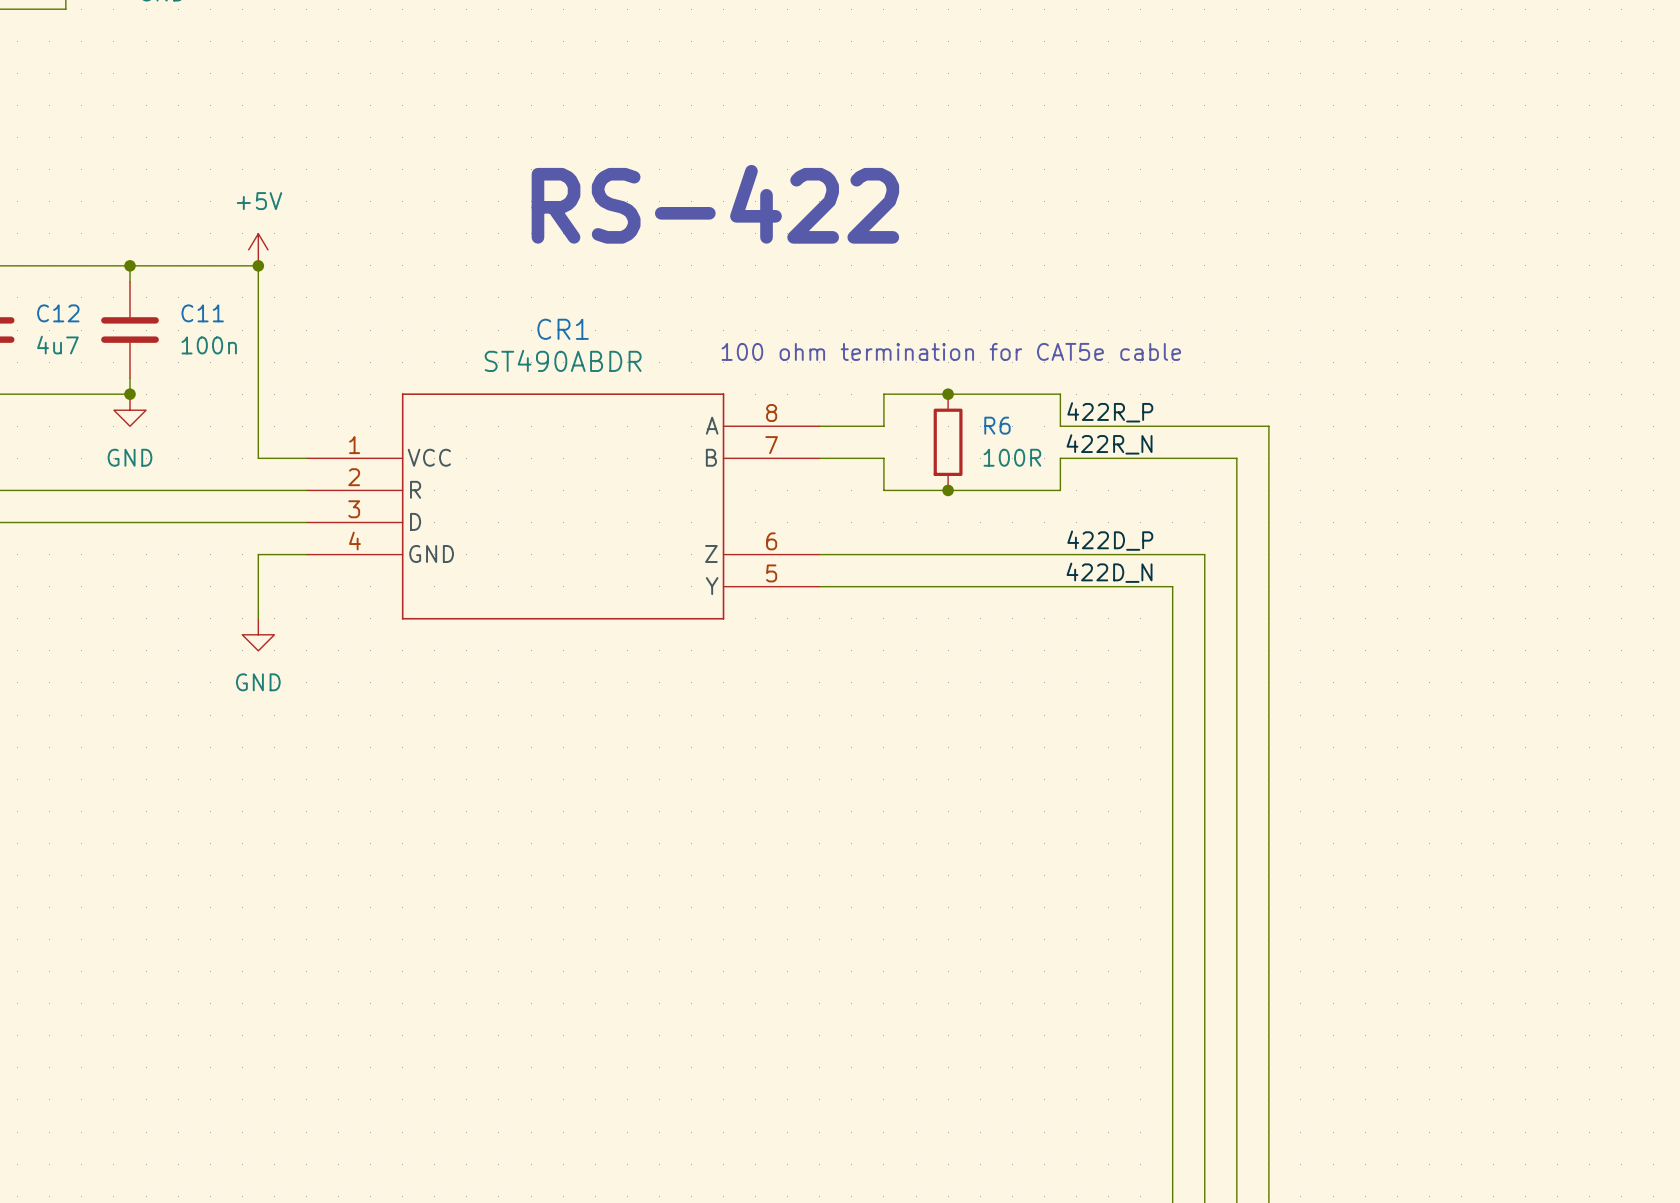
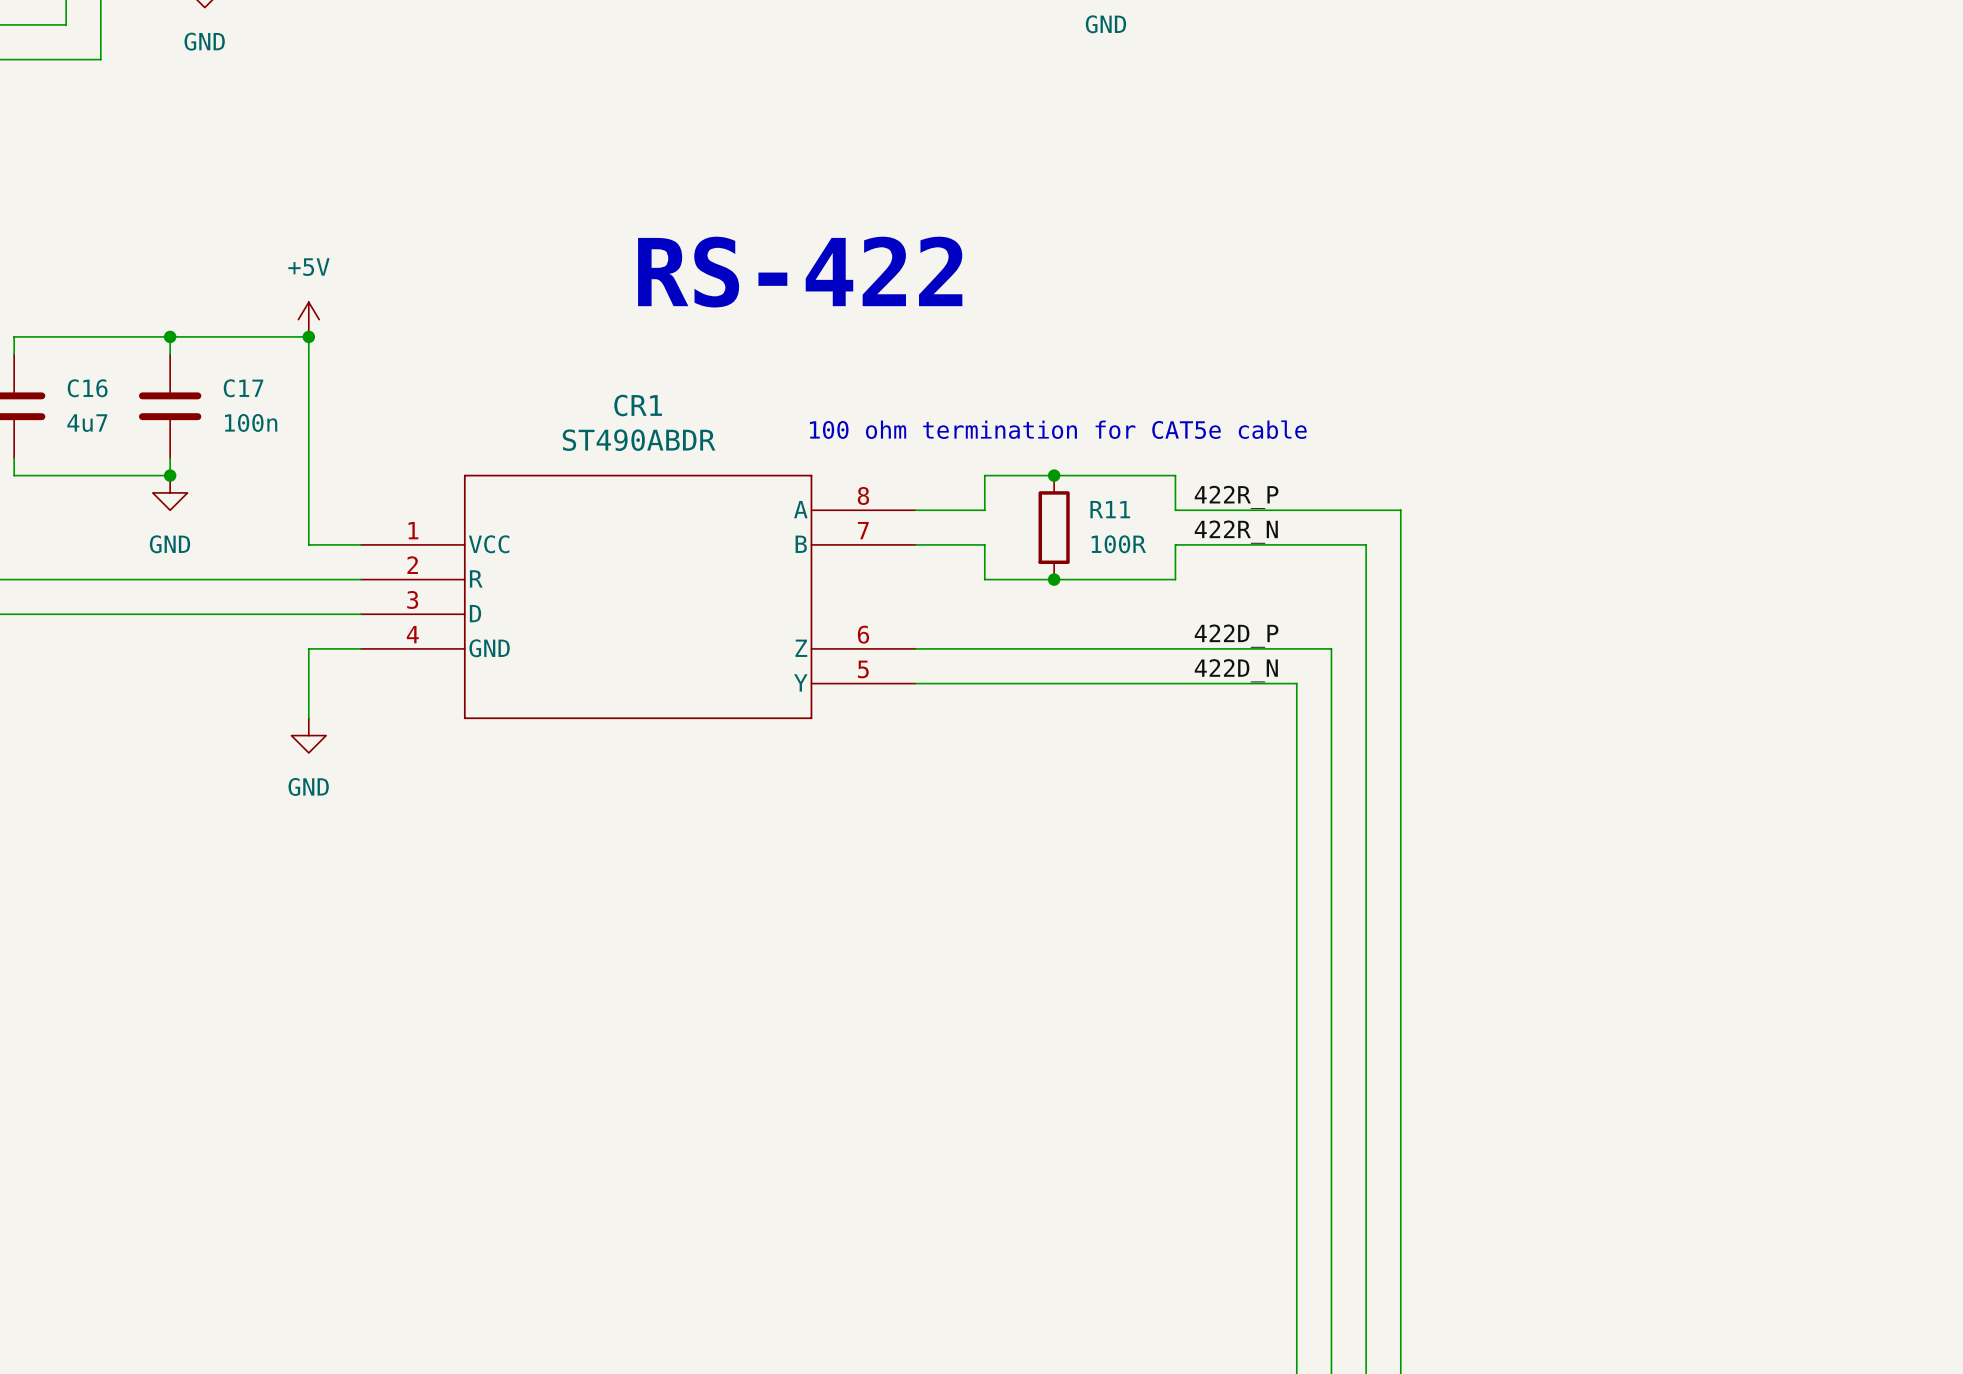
C12 name: C12 (58, 313) -> C16 (87, 388)
C11 name: C11 (202, 313) -> C17 (243, 388)
R6 name: R6 (997, 425) -> R11 (1110, 509)

